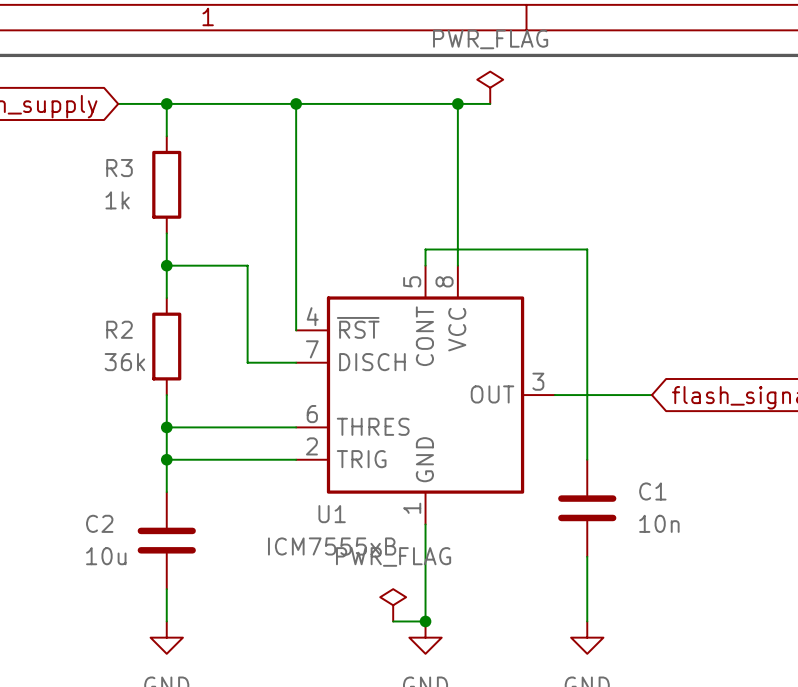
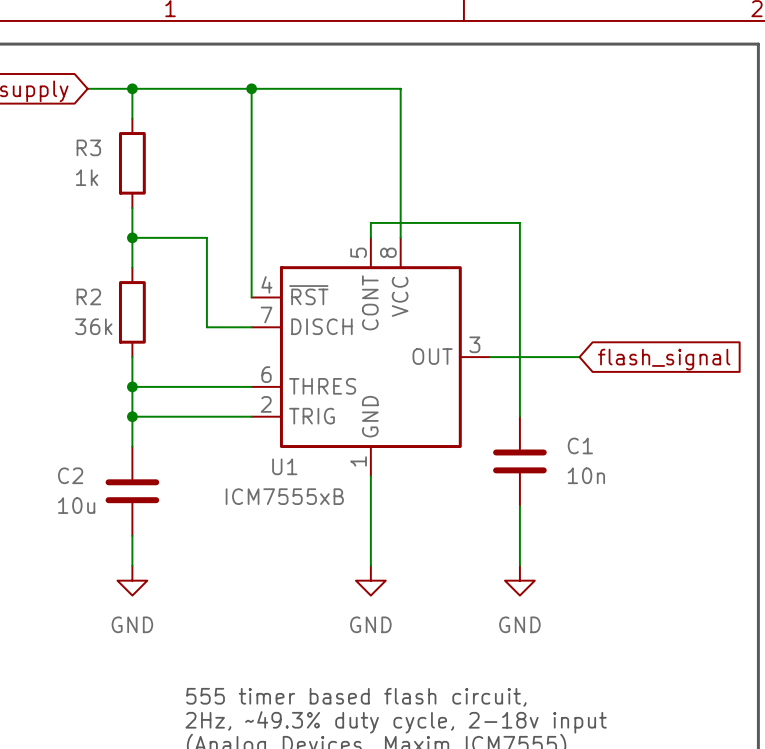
power symbol: PWR_FLAG (490, 87) -> none
wire: (457, 103) (490, 103) -> none
junction: (457, 103) -> none
power symbol: PWR_FLAG (393, 605) -> none
wire: (393, 621) (425, 621) -> none
junction: (425, 621) -> none

